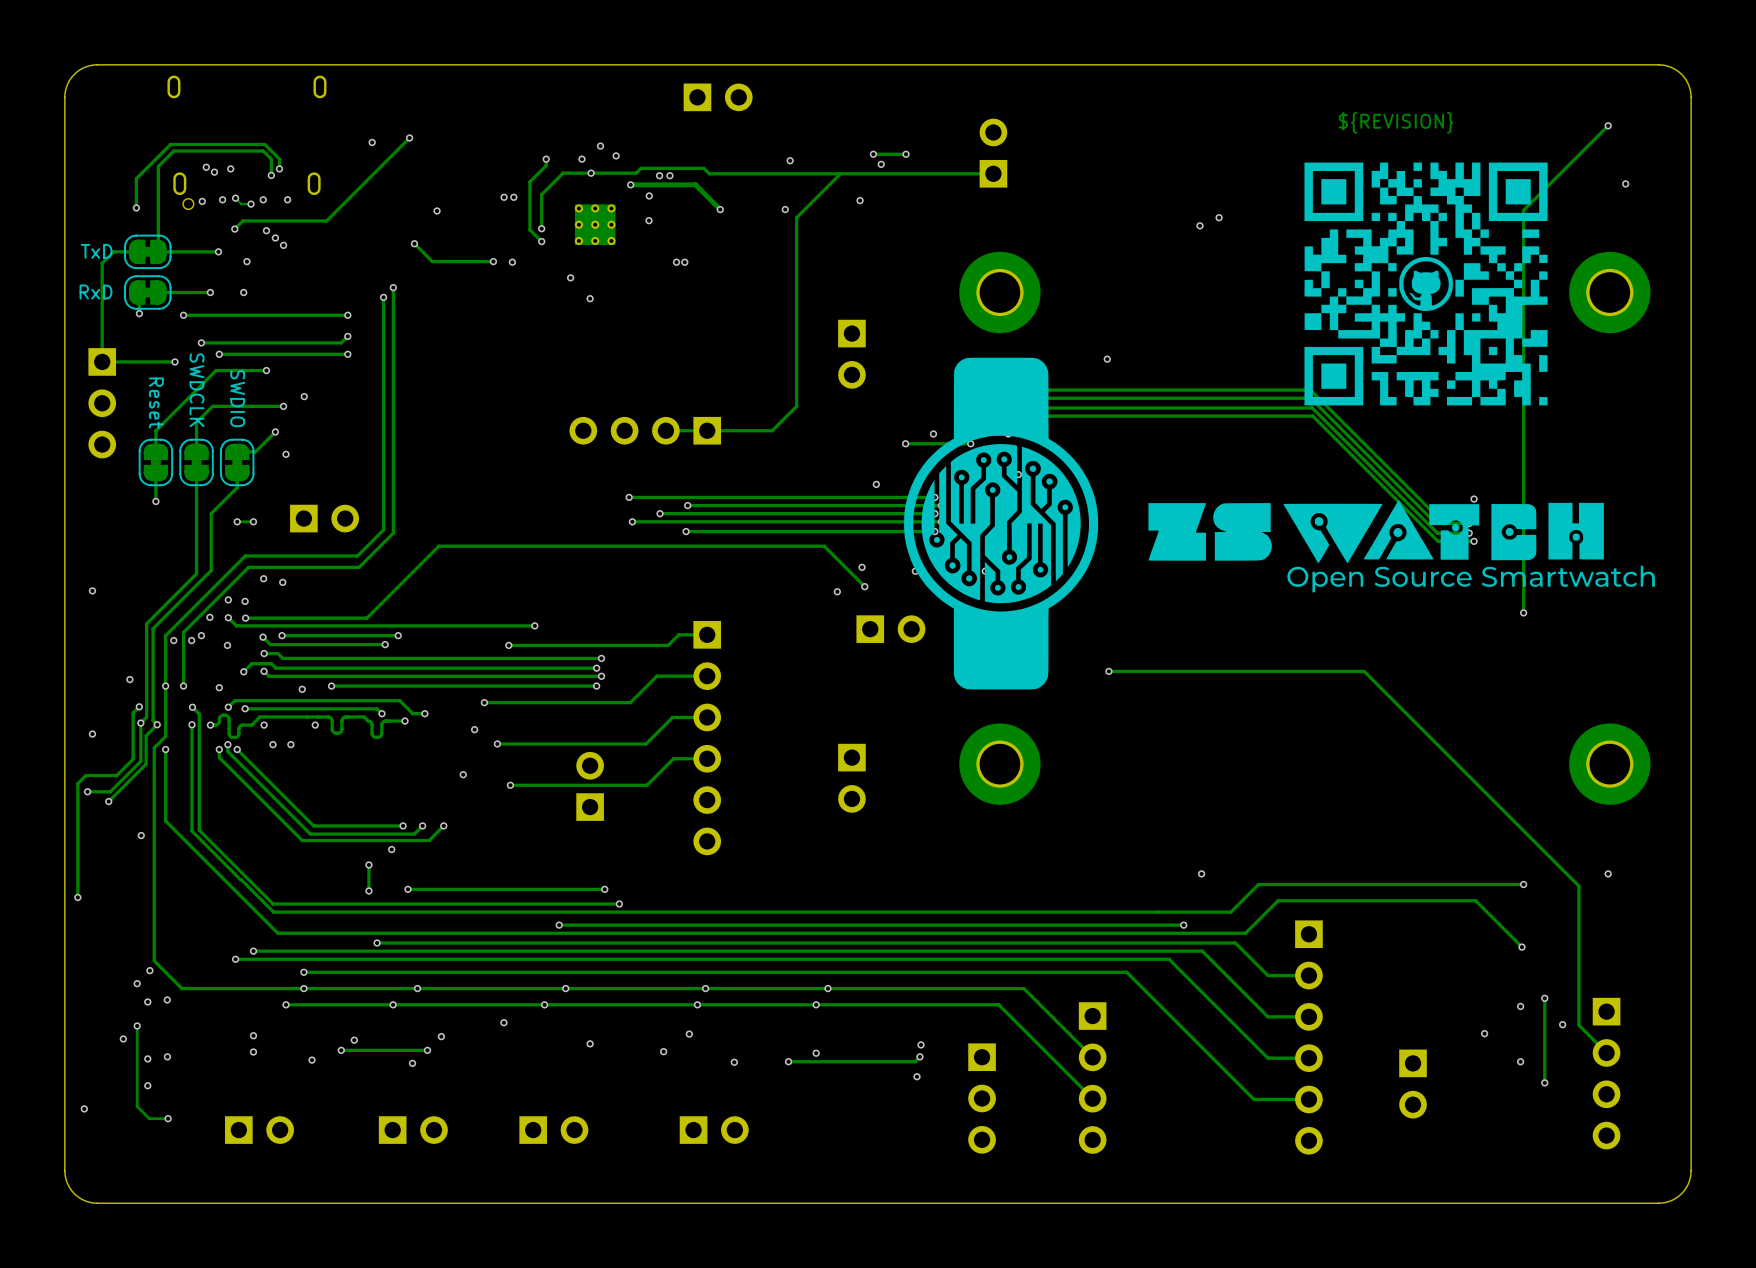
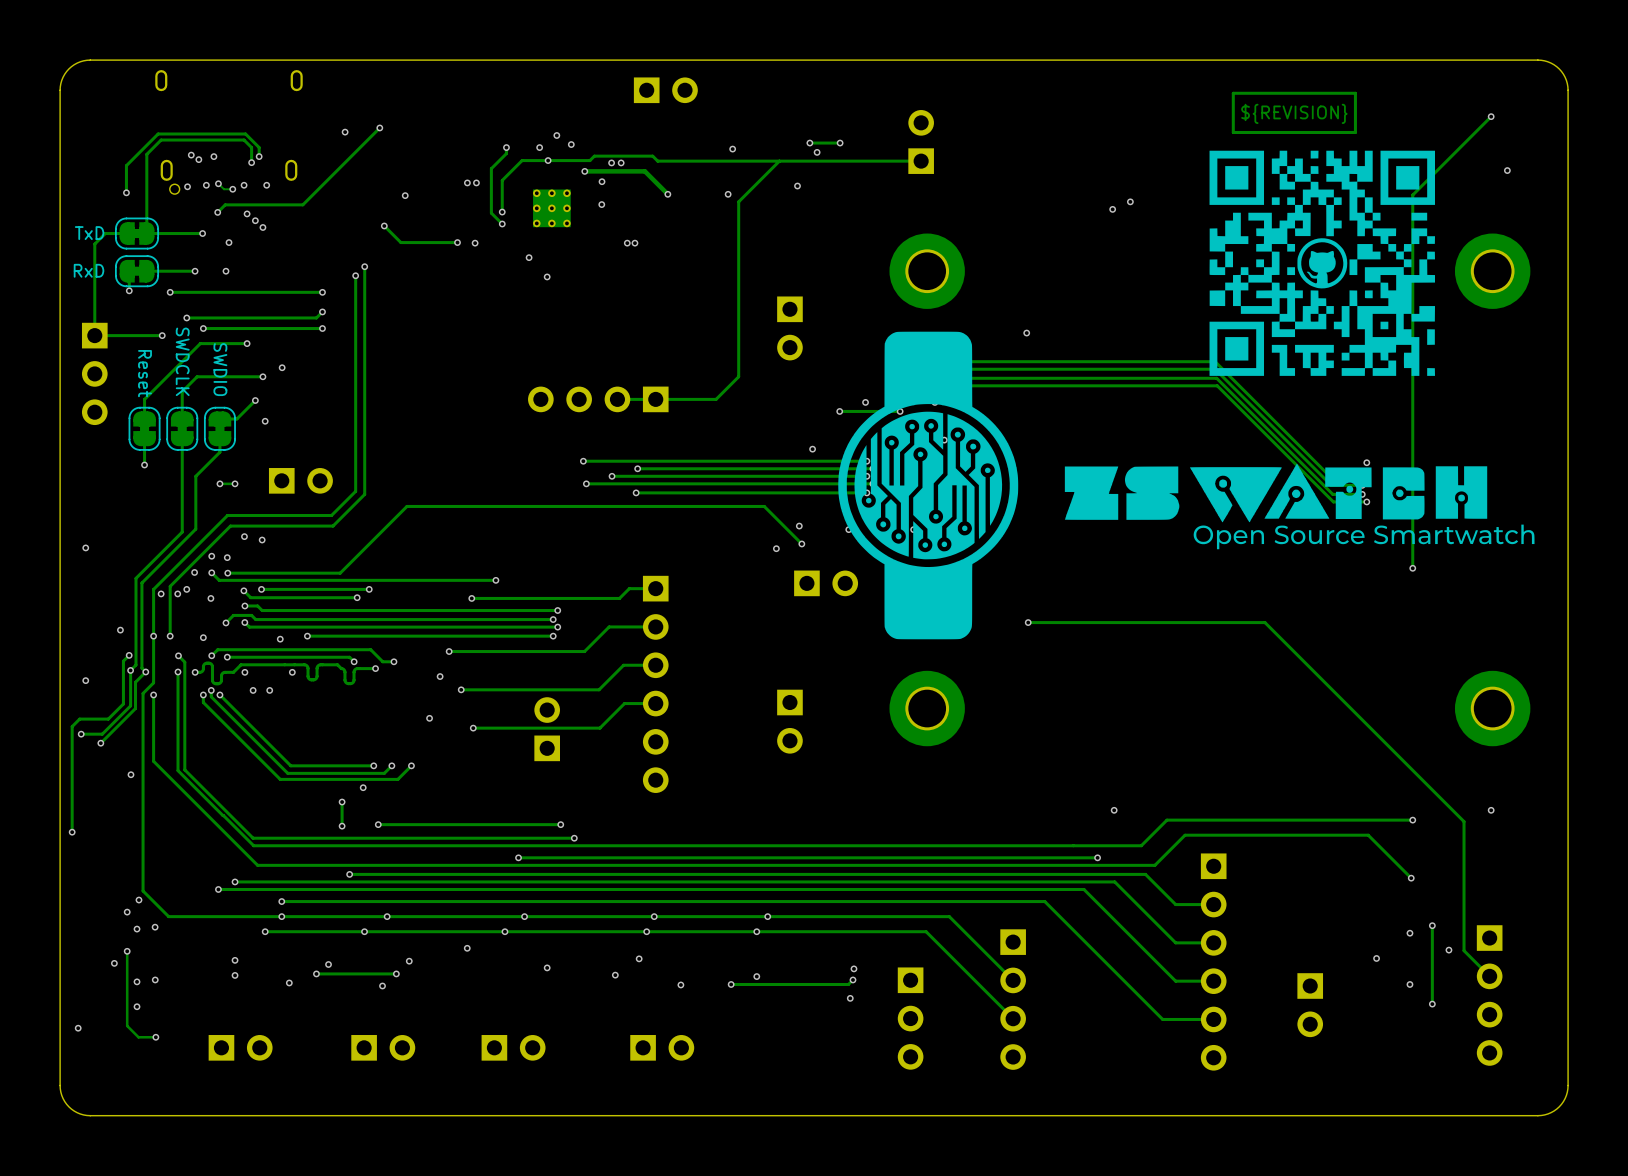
track: none -> (1355, 93) (1233, 93) (1233, 132) (1355, 132) (1355, 93)

